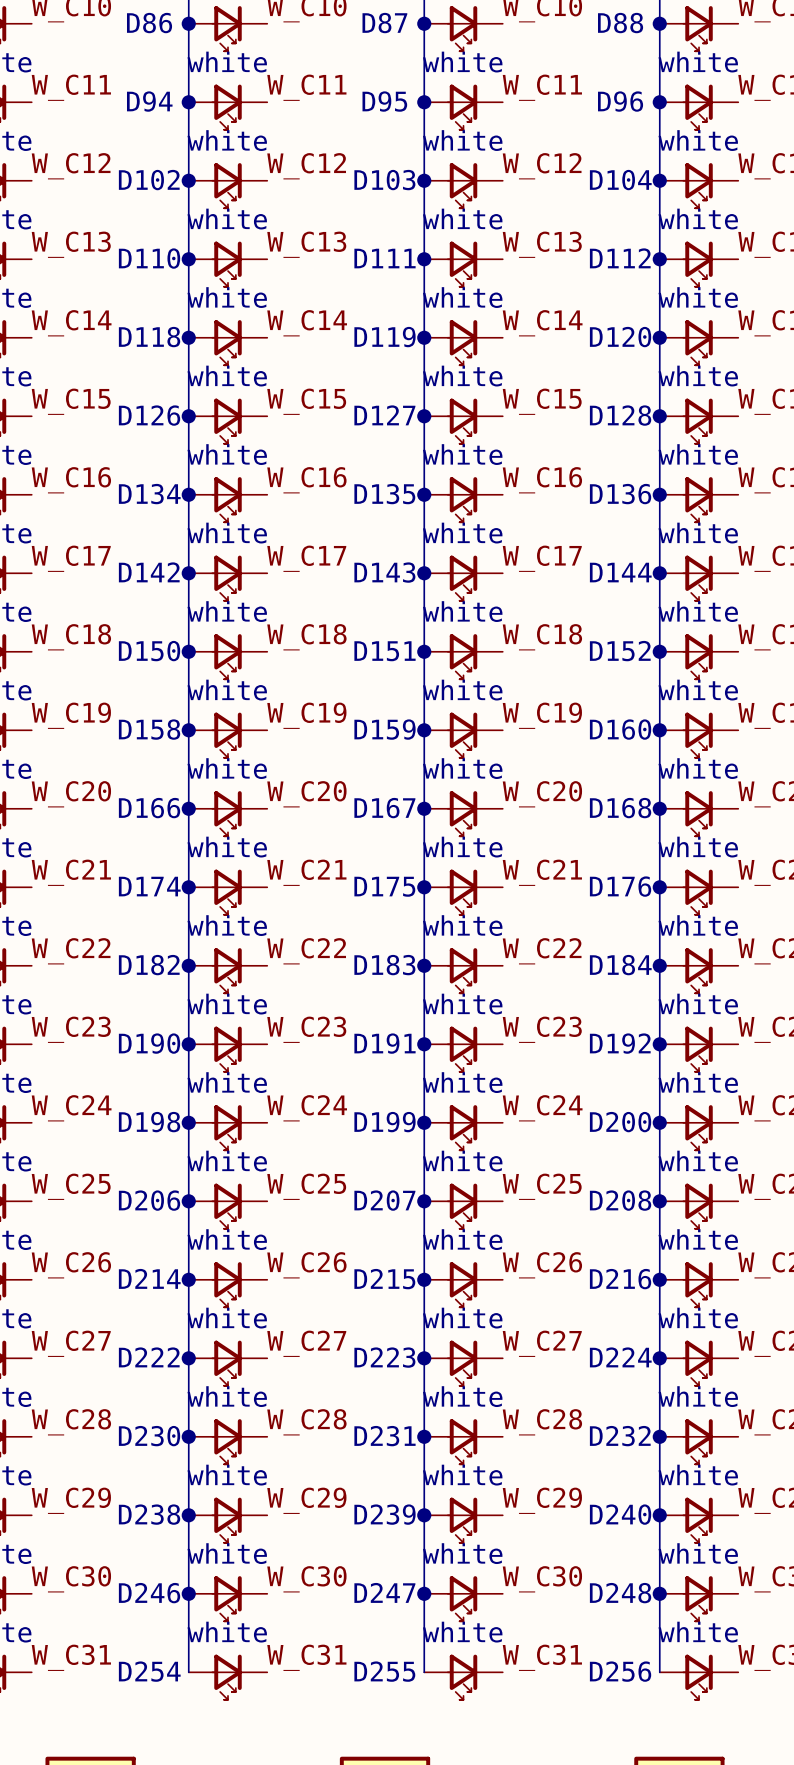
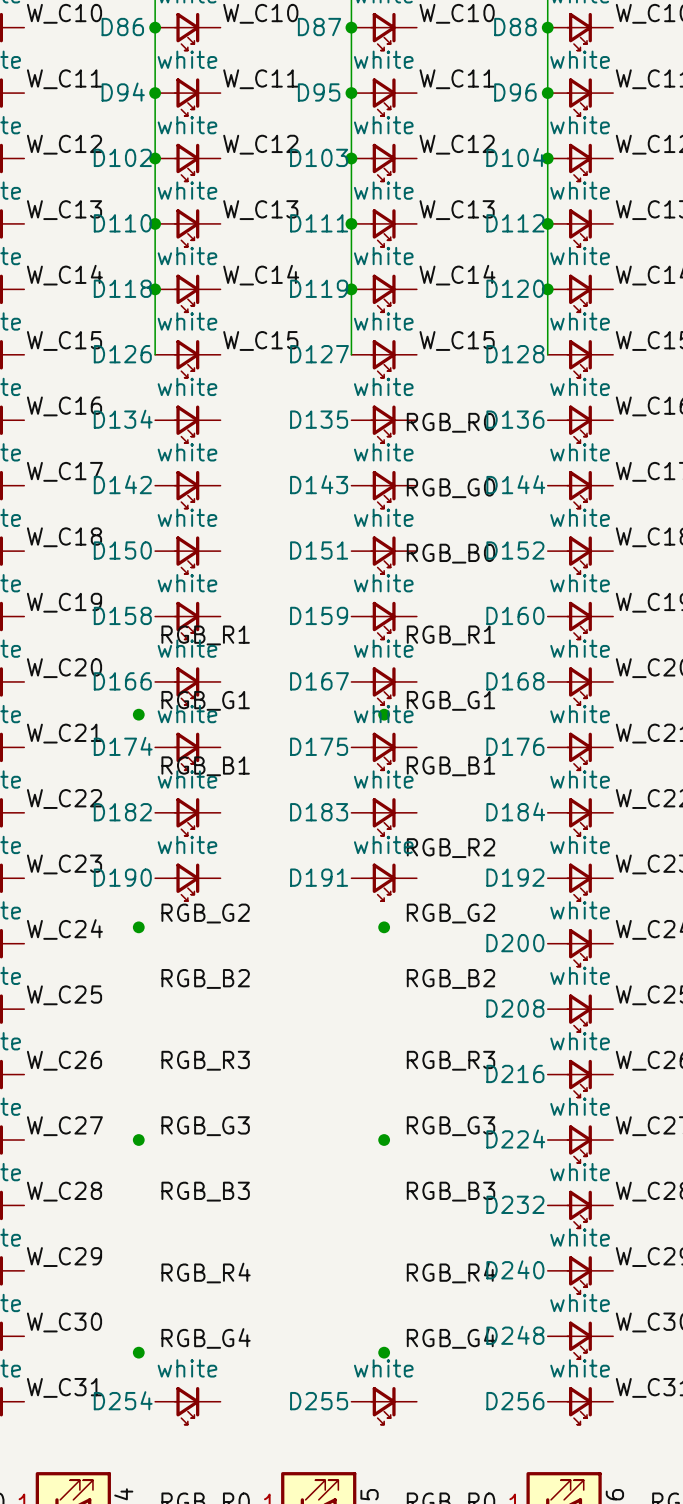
wire: (188, 416) (188, 1672) -> none
junction: (188, 416) -> none
wire: (424, 416) (424, 1672) -> none
junction: (424, 416) -> none
wire: (659, 416) (659, 1672) -> none
junction: (659, 416) -> none
label: W_C16 (306, 480) -> none
label: W_C16 (542, 480) -> none
junction: (188, 494) -> none
junction: (424, 494) -> none
junction: (659, 494) -> none
label: none -> RGB_R0 (451, 422)
label: W_C17 (306, 558) -> none
label: W_C17 (542, 558) -> none
junction: (188, 573) -> none
junction: (424, 573) -> none
junction: (659, 573) -> none
label: none -> RGB_G0 (451, 488)
label: W_C18 (306, 637) -> none
label: W_C18 (542, 637) -> none
junction: (188, 651) -> none
junction: (424, 651) -> none
junction: (659, 651) -> none
label: none -> RGB_B0 (451, 553)
label: W_C19 (306, 715) -> none
label: W_C19 (542, 715) -> none
junction: (188, 730) -> none
junction: (424, 730) -> none
junction: (659, 730) -> none
label: none -> RGB_R1 (205, 635)
label: none -> RGB_R1 (451, 635)
label: W_C20 (306, 794) -> none
label: W_C20 (542, 794) -> none
junction: (188, 808) -> none
junction: (424, 808) -> none
junction: (659, 808) -> none
label: none -> RGB_G1 (205, 700)
label: none -> RGB_G1 (451, 700)
junction: none -> (138, 714)
junction: none -> (384, 714)
label: W_C21 (306, 872) -> none
label: W_C21 (542, 872) -> none
junction: (188, 887) -> none
junction: (424, 887) -> none
junction: (659, 887) -> none
label: none -> RGB_B1 (205, 766)
label: none -> RGB_B1 (451, 766)
label: W_C22 (306, 951) -> none
label: W_C22 (542, 951) -> none
junction: (188, 965) -> none
junction: (424, 965) -> none
junction: (659, 965) -> none
label: none -> RGB_R2 (451, 848)
label: W_C23 (306, 1029) -> none
label: W_C23 (542, 1029) -> none
junction: (188, 1044) -> none
junction: (424, 1044) -> none
junction: (659, 1044) -> none
label: none -> RGB_G2 (205, 913)
label: none -> RGB_G2 (451, 913)
junction: none -> (384, 927)
label: W_C24 (307, 1108) -> none
label: W_C24 (542, 1108) -> none
junction position: (188, 1122) -> (138, 927)
junction: (424, 1122) -> none
junction: (659, 1122) -> none
D198: white (228, 1127) -> none
D199: white (463, 1127) -> none
label: none -> RGB_B2 (205, 978)
label: none -> RGB_B2 (451, 978)
label: W_C25 (306, 1186) -> none
label: W_C25 (542, 1186) -> none
junction: (188, 1201) -> none
junction: (424, 1201) -> none
junction: (659, 1201) -> none
D206: white (228, 1206) -> none
D207: white (463, 1206) -> none
label: none -> RGB_R3 (205, 1060)
label: W_C26 (306, 1265) -> none
label: W_C26 (542, 1265) -> none
label: none -> RGB_R3 (451, 1060)
junction: (188, 1279) -> none
junction: (424, 1279) -> none
junction: (659, 1279) -> none
D214: white (228, 1284) -> none
D215: white (463, 1284) -> none
label: none -> RGB_G3 (205, 1126)
label: W_C27 (306, 1343) -> none
label: W_C27 (542, 1343) -> none
label: none -> RGB_G3 (451, 1126)
junction position: (188, 1358) -> (138, 1140)
junction position: (424, 1358) -> (384, 1140)
junction: (659, 1358) -> none
D222: white (228, 1363) -> none
D223: white (463, 1363) -> none
label: none -> RGB_B3 (205, 1191)
label: W_C28 (306, 1422) -> none
label: W_C28 (542, 1422) -> none
label: none -> RGB_B3 (451, 1191)
junction: (188, 1436) -> none
junction: (424, 1436) -> none
junction: (659, 1436) -> none
D230: white (228, 1441) -> none
D231: white (463, 1441) -> none
label: W_C29 (306, 1500) -> none
label: W_C29 (542, 1500) -> none
junction: (188, 1515) -> none
junction: (424, 1515) -> none
junction: (659, 1515) -> none
D238: white (228, 1520) -> none
label: none -> RGB_R4 (206, 1273)
D239: white (463, 1520) -> none
label: none -> RGB_R4 (451, 1273)
label: W_C30 (306, 1579) -> none
label: W_C30 (542, 1579) -> none
junction position: (188, 1593) -> (138, 1352)
junction position: (424, 1593) -> (384, 1352)
junction: (659, 1593) -> none
D246: white (228, 1598) -> none
label: none -> RGB_G4 (206, 1338)
D247: white (463, 1598) -> none
label: none -> RGB_G4 (451, 1338)
label: W_C31 (306, 1657) -> none
label: W_C31 (542, 1657) -> none

